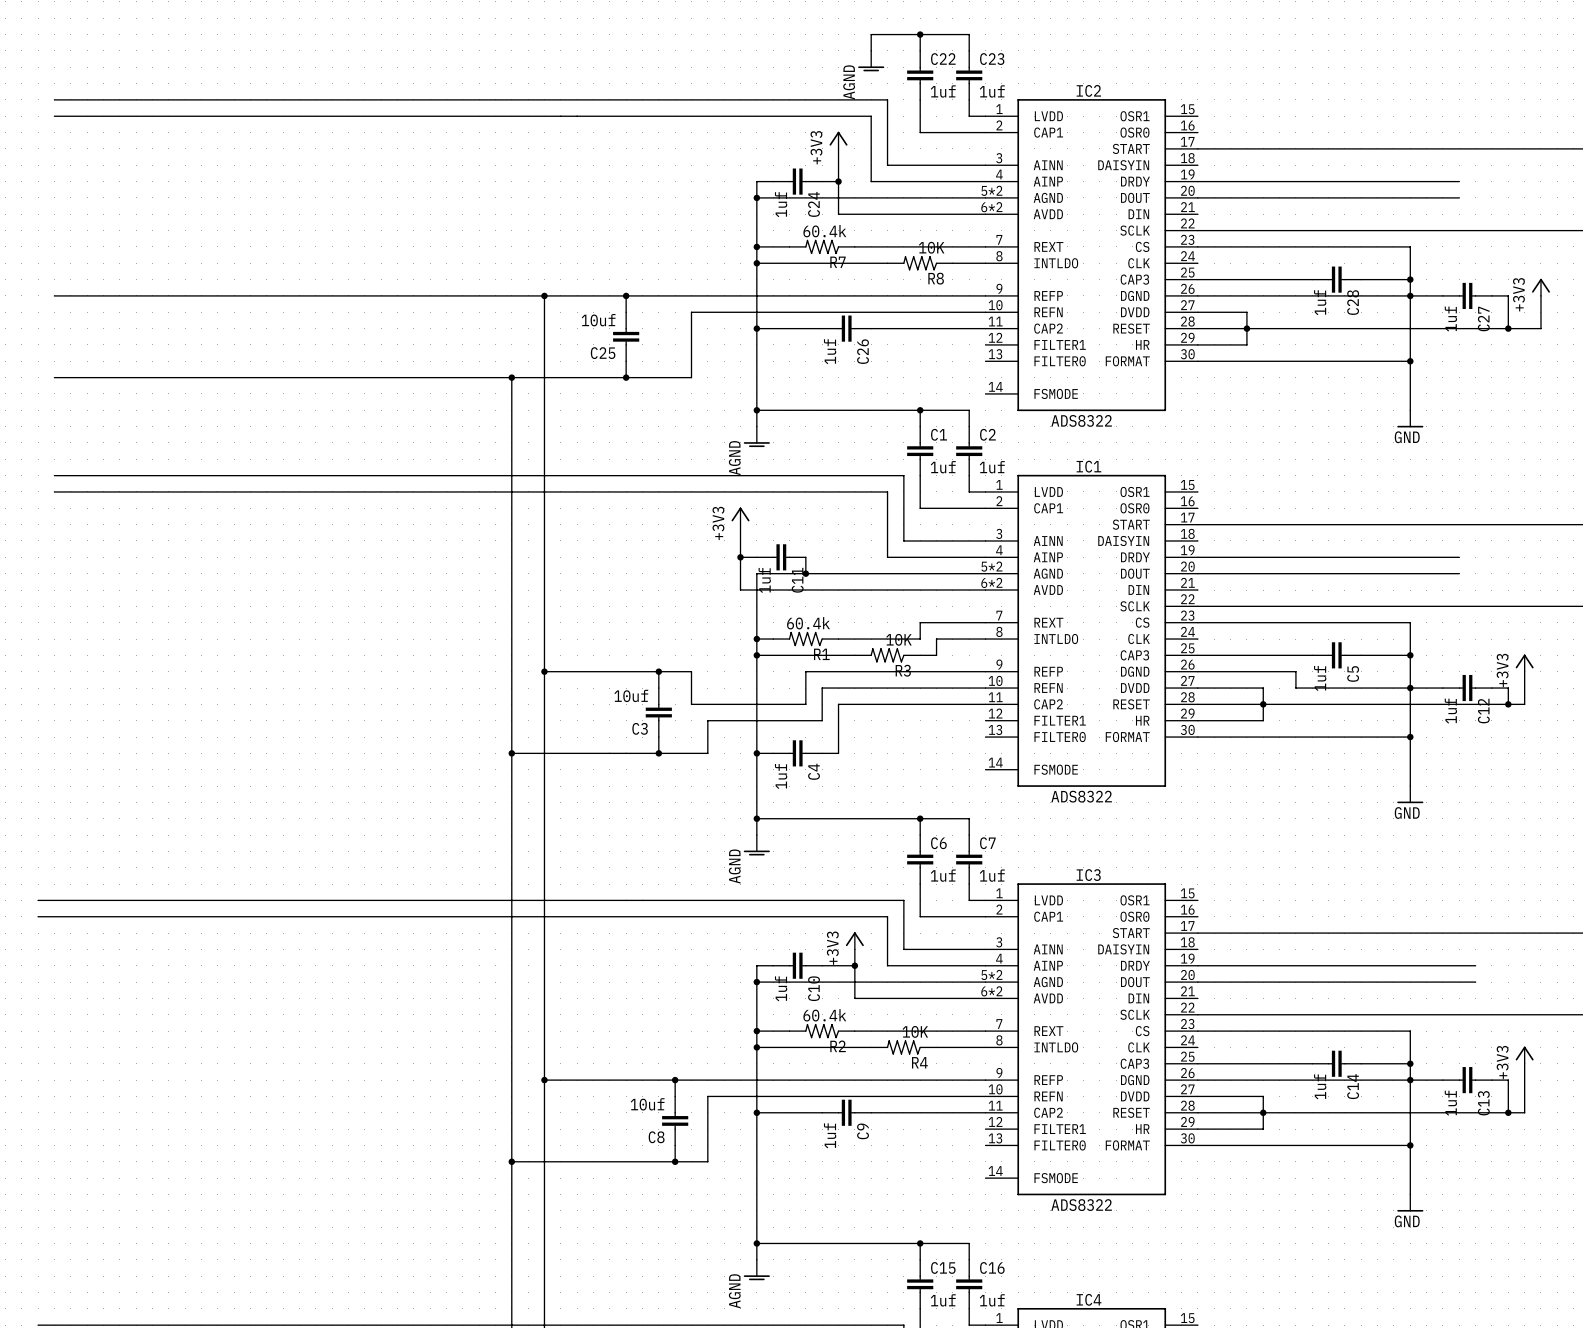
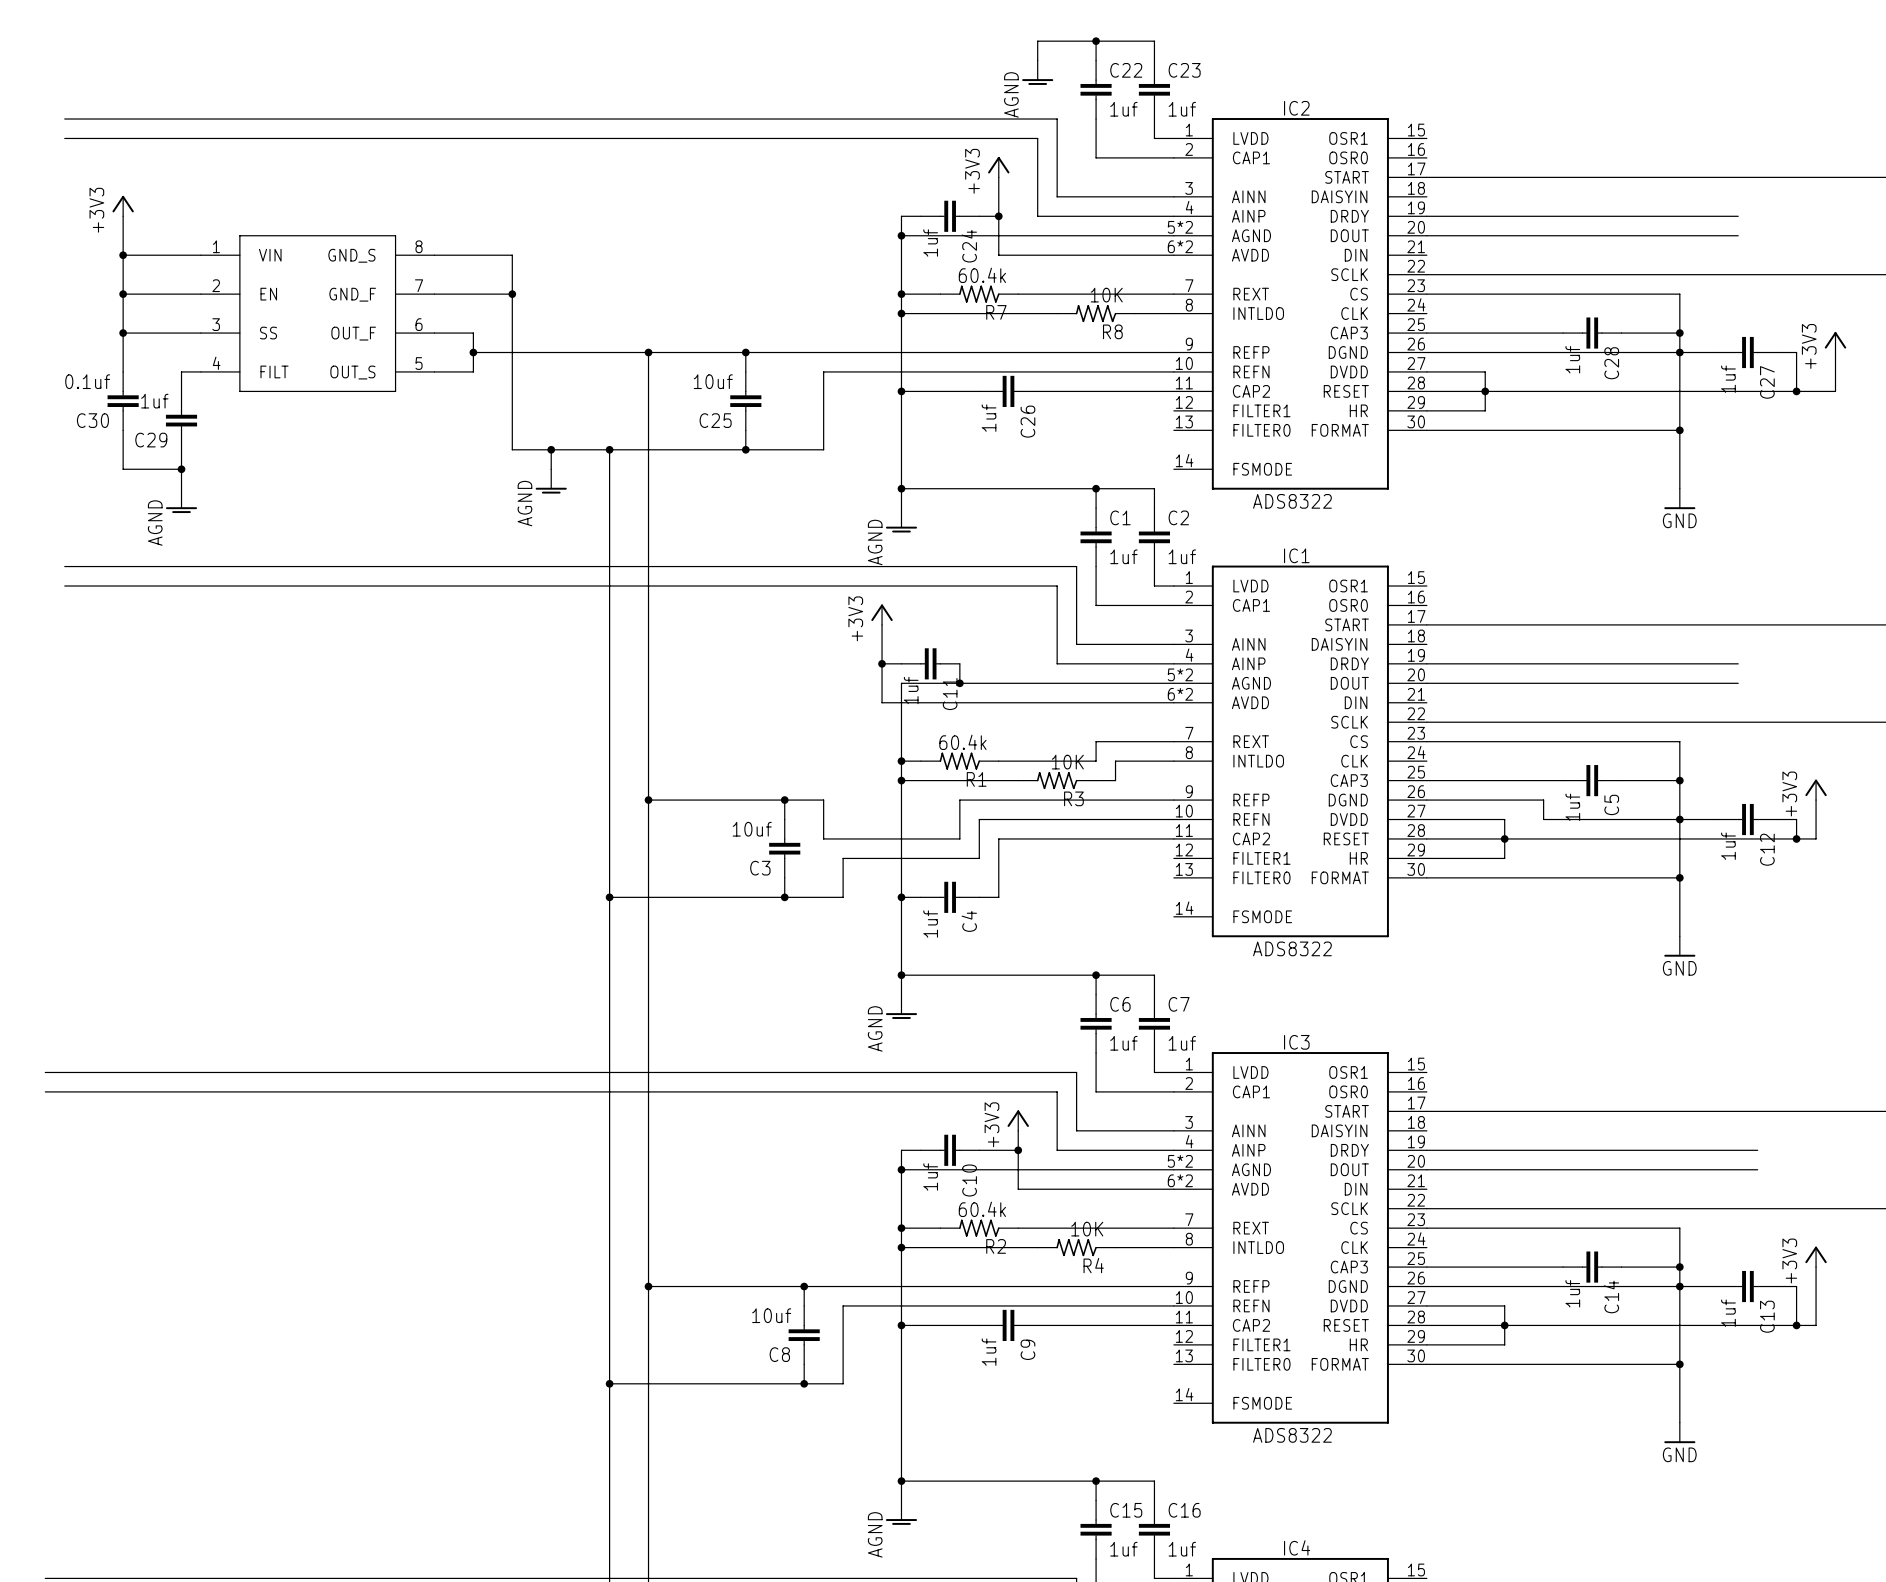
power symbol: none -> +3V3 (123, 206)
wire: none -> (123, 216) (123, 371)
wire: none -> (123, 255) (200, 255)
junction: none -> (123, 255)
wire: none -> (123, 294) (200, 294)
junction: none -> (123, 294)
wire: none -> (434, 294) (512, 294)
junction: none -> (512, 294)
part: none -> (317, 313)
wire: none -> (123, 333) (200, 333)
junction: none -> (123, 333)
wire: none -> (434, 333) (473, 333) (473, 371) (434, 371)
wire: (54, 295) (397, 295) -> none
junction: none -> (473, 352)
wire: none -> (200, 371) (181, 371) (181, 391)
C30: none -> 0.1uf (123, 401)
C29: none -> 1uf (181, 420)
wire: none -> (123, 430) (123, 469) (181, 469)
wire: (54, 377) (430, 377) -> (434, 255) (512, 255) (512, 449)
wire: none -> (181, 449) (181, 488)
wire: none -> (551, 449) (551, 469)
junction: none -> (551, 449)
junction: none -> (181, 469)
power symbol: none -> AGND (551, 481)
power symbol: none -> AGND (181, 500)

